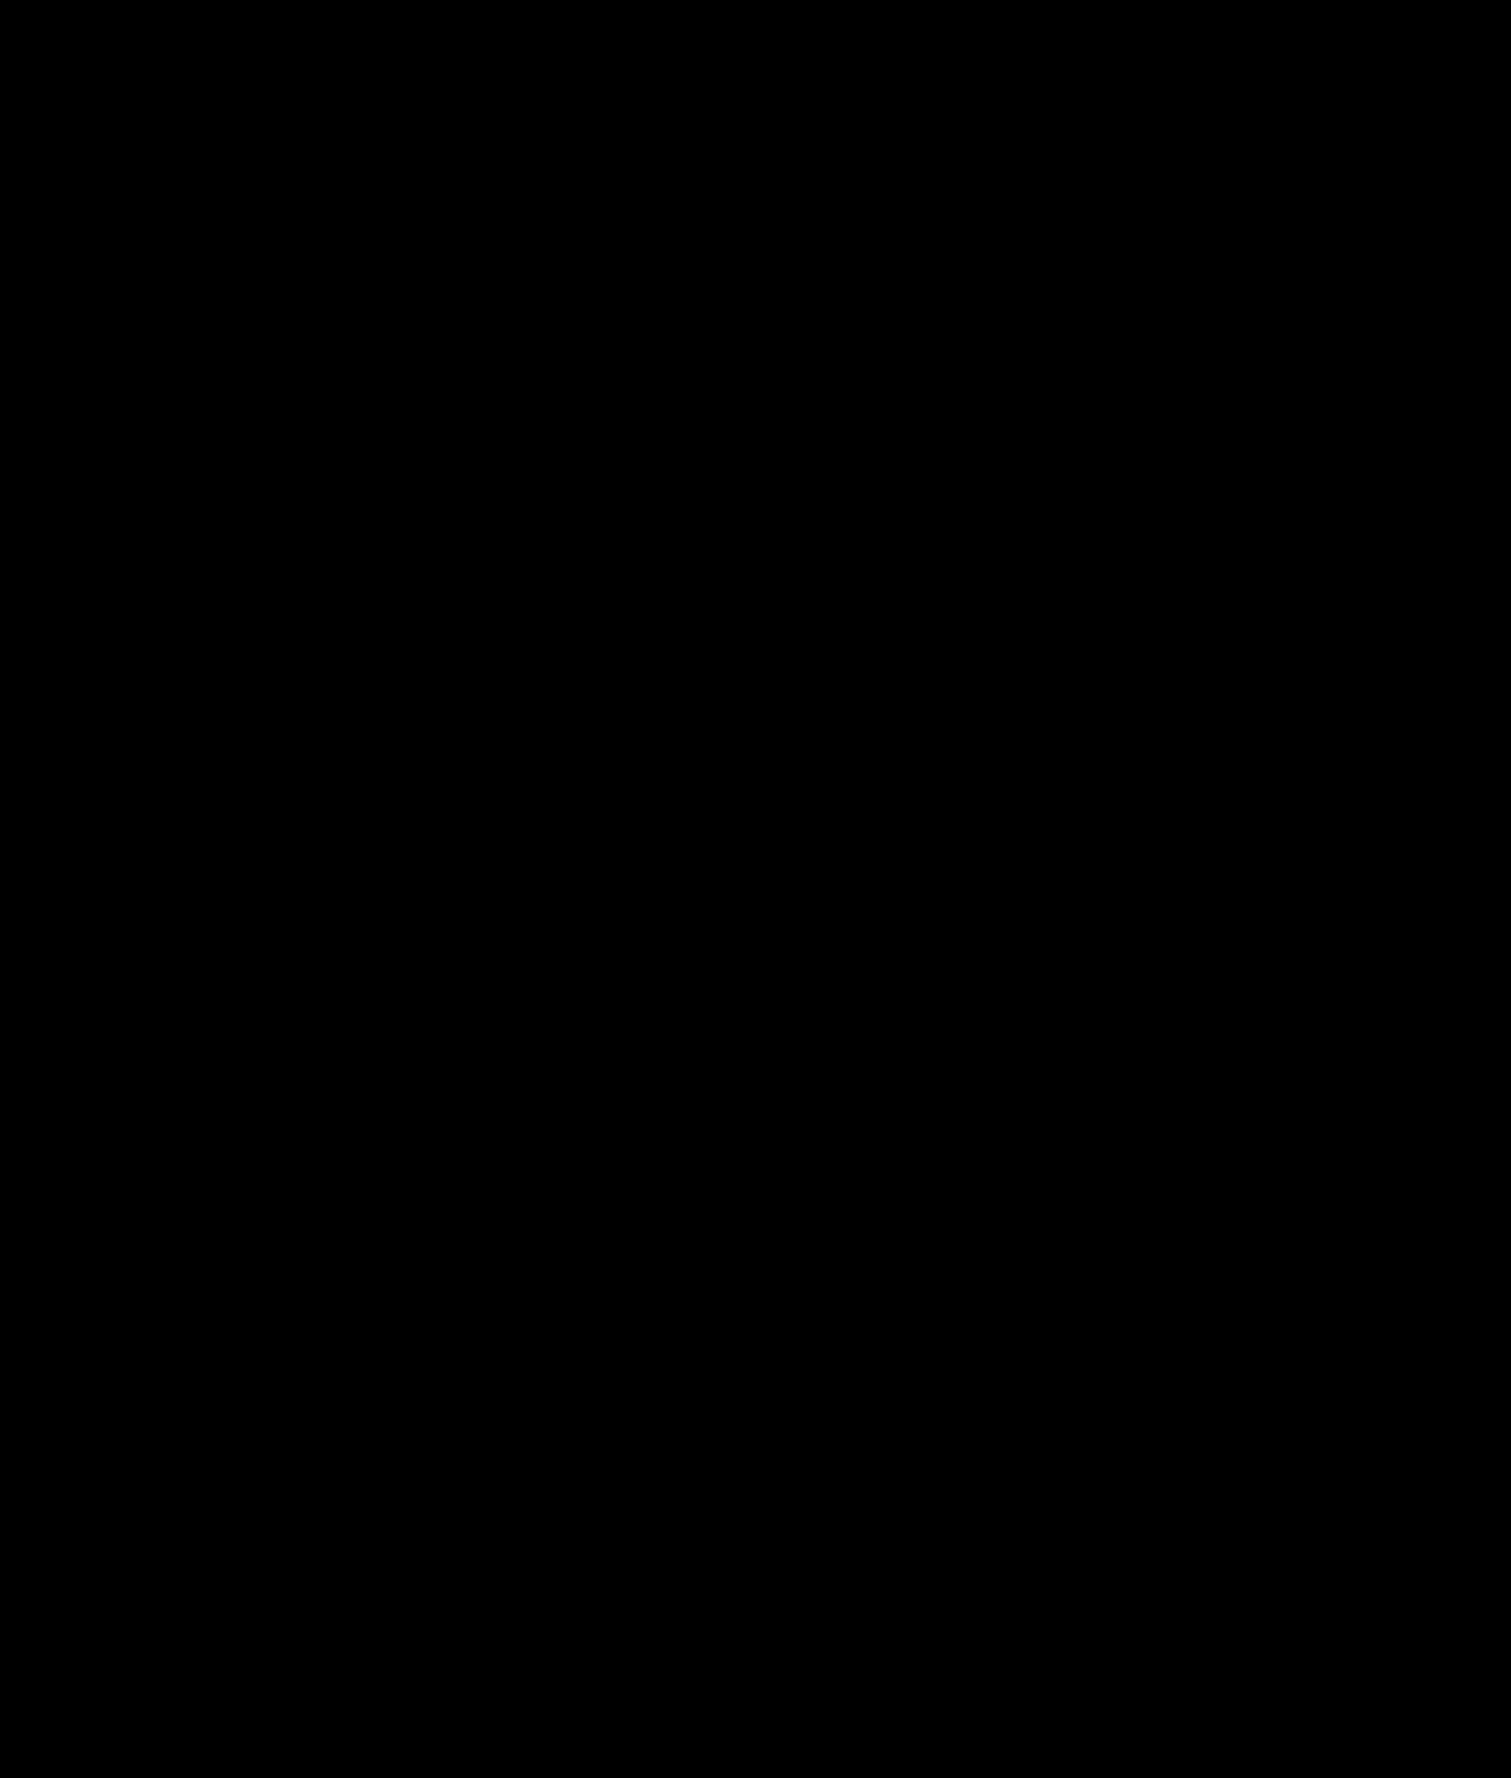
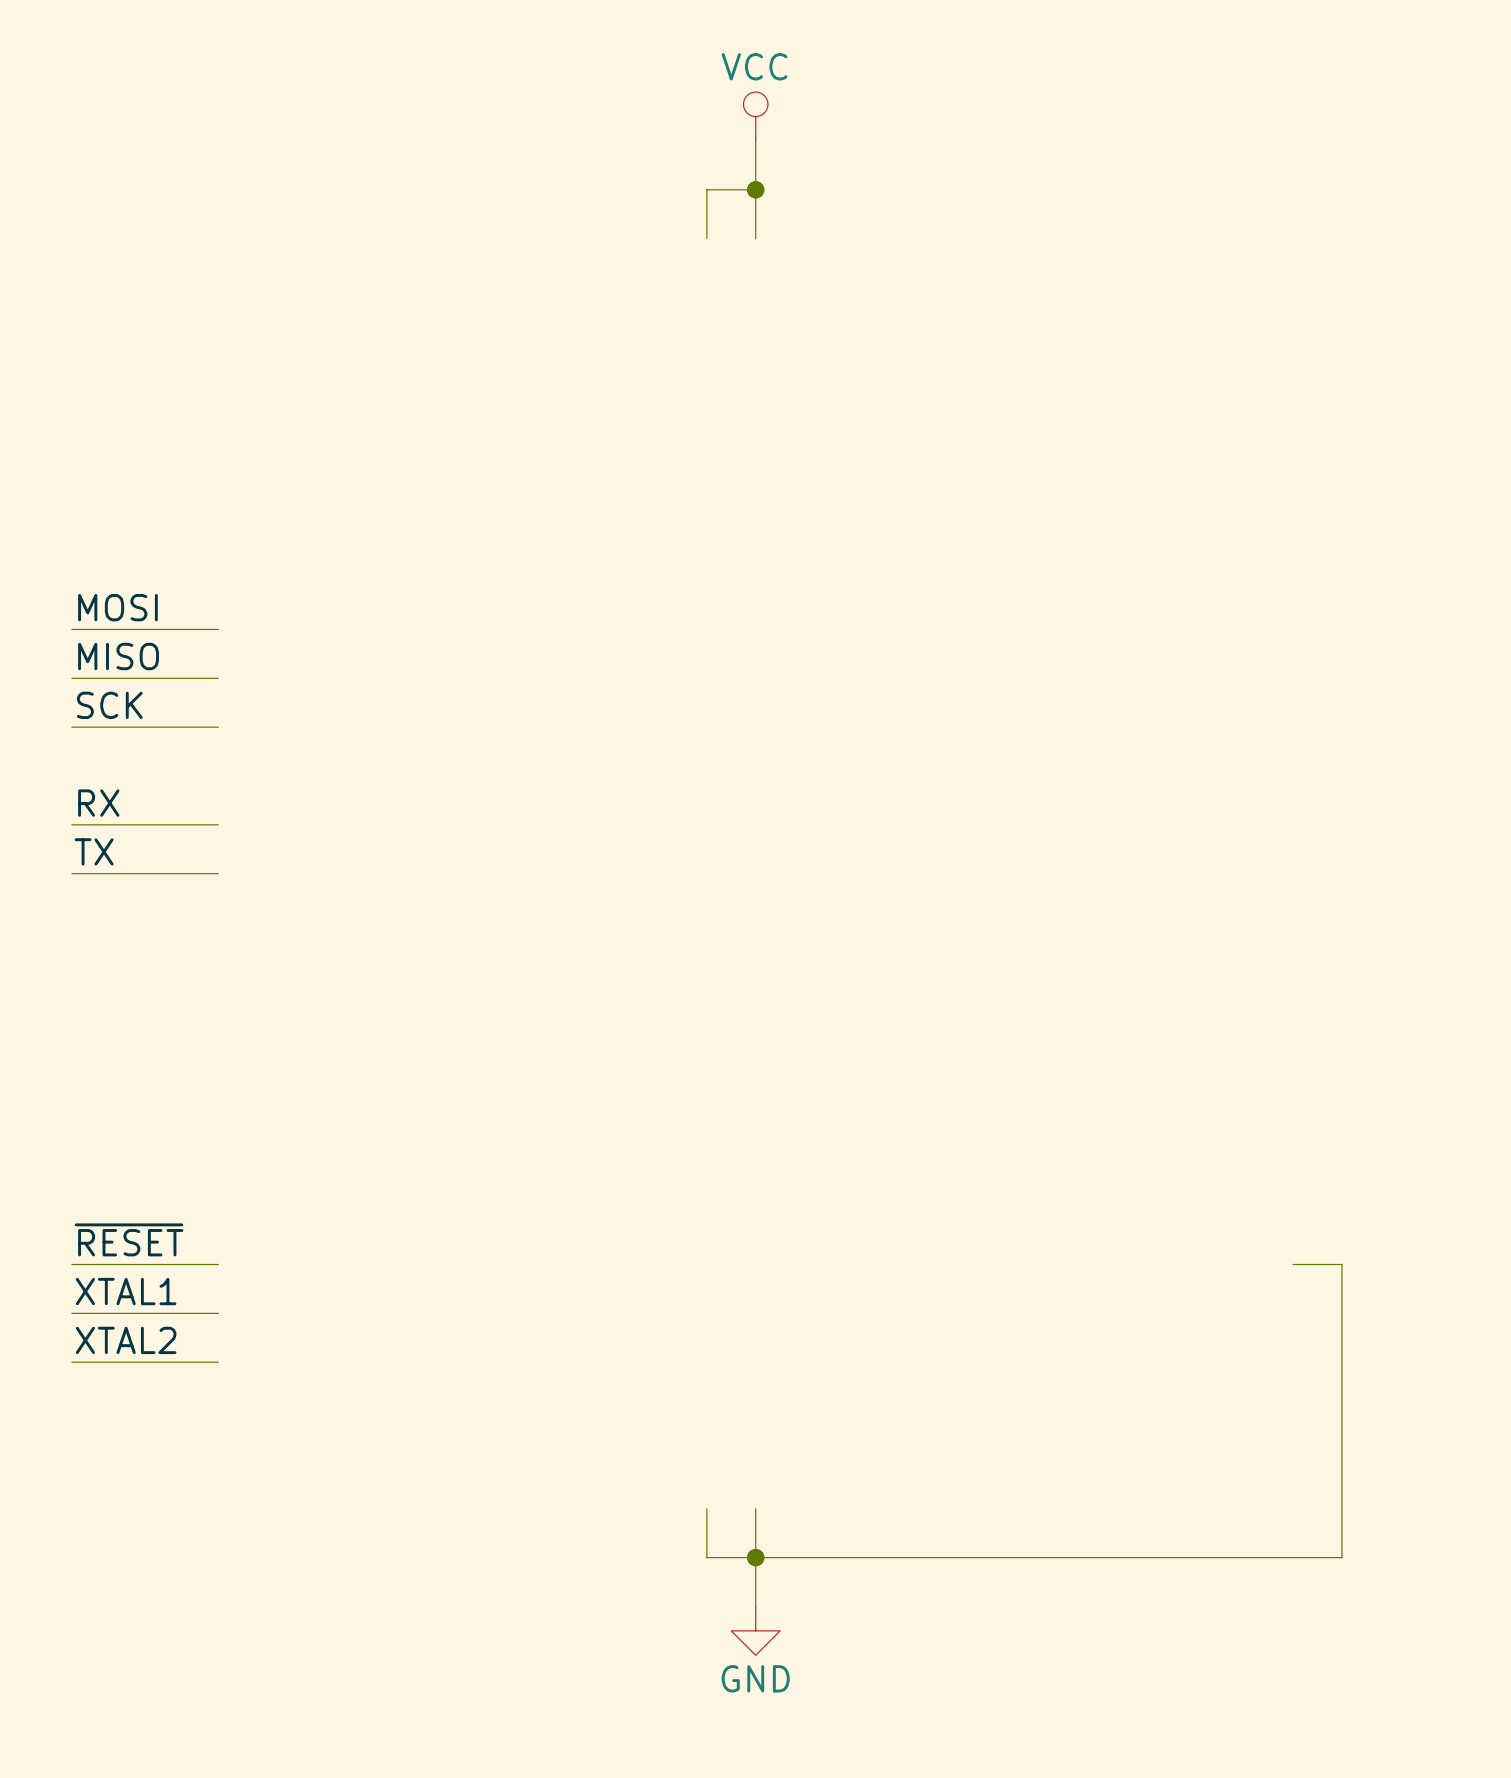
power symbol: none -> VCC (755, 116)
wire: none -> (755, 140) (755, 238)
wire: none -> (755, 189) (706, 189) (706, 238)
junction: none -> (755, 189)
label: none -> MOSI (117, 607)
wire: none -> (71, 629) (218, 629)
label: none -> MISO (118, 656)
wire: none -> (71, 678) (218, 678)
label: none -> SCK (109, 705)
wire: none -> (71, 727) (218, 727)
label: none -> RX (98, 803)
wire: none -> (71, 824) (218, 824)
label: none -> TX (94, 851)
wire: none -> (71, 873) (218, 873)
label: none -> ~{RESET} (129, 1239)
wire: none -> (71, 1264) (218, 1264)
wire: none -> (1293, 1264) (1341, 1264) (1341, 1557) (706, 1557) (706, 1508)
label: none -> XTAL1 (126, 1291)
wire: none -> (71, 1313) (218, 1313)
label: none -> XTAL2 (126, 1340)
wire: none -> (71, 1362) (218, 1362)
wire: none -> (755, 1508) (755, 1606)
junction: none -> (755, 1557)
power symbol: none -> GND (755, 1630)

